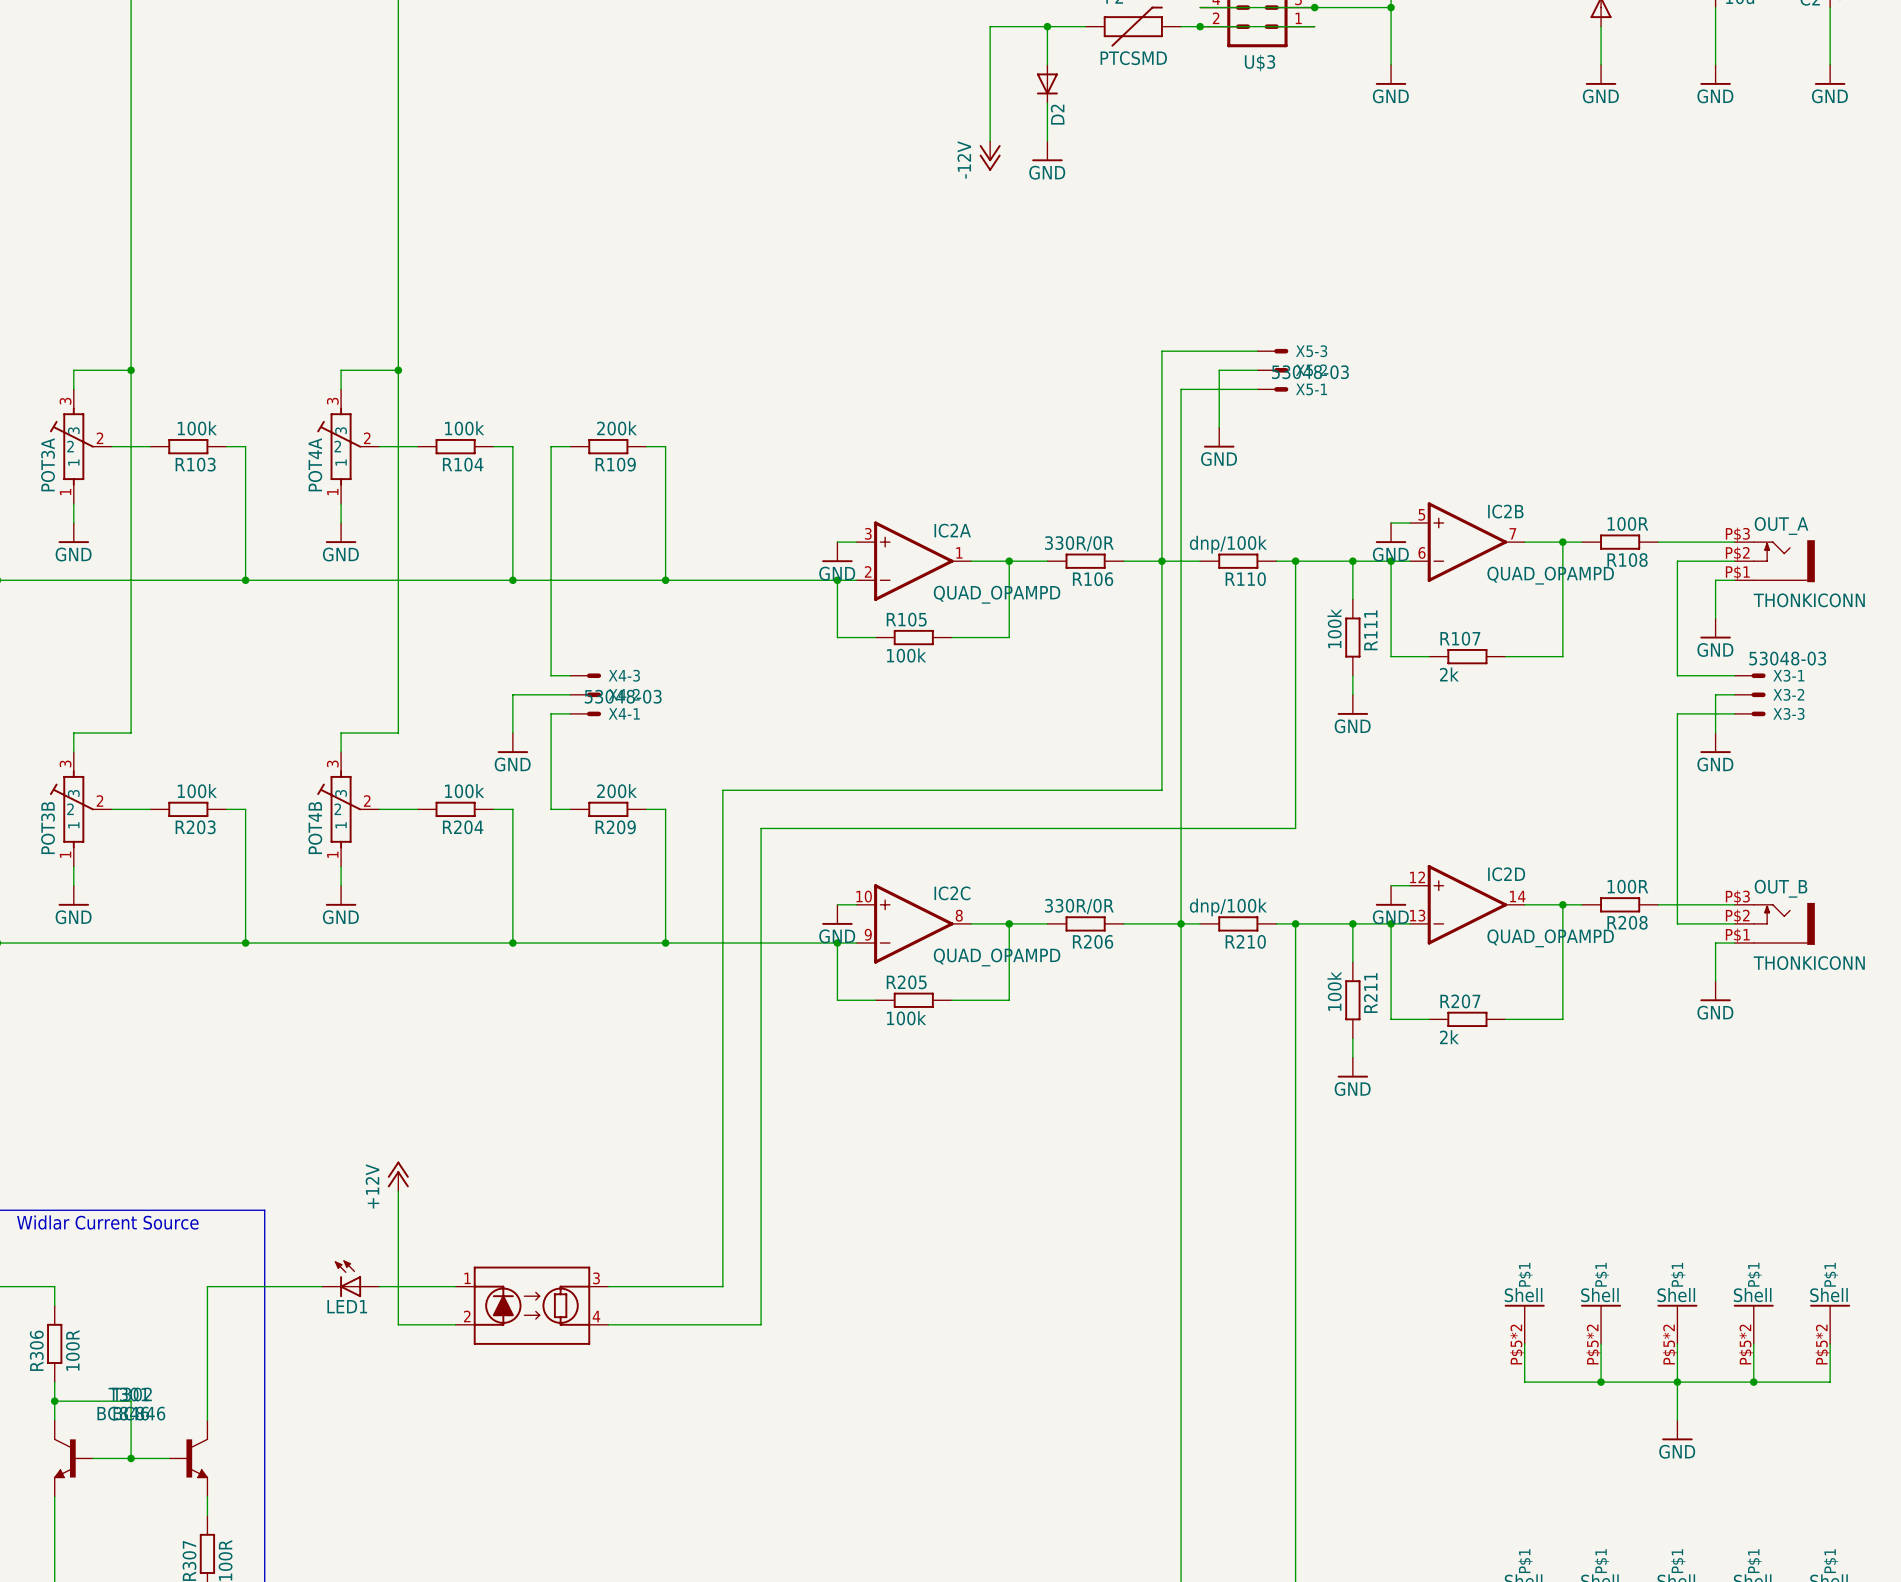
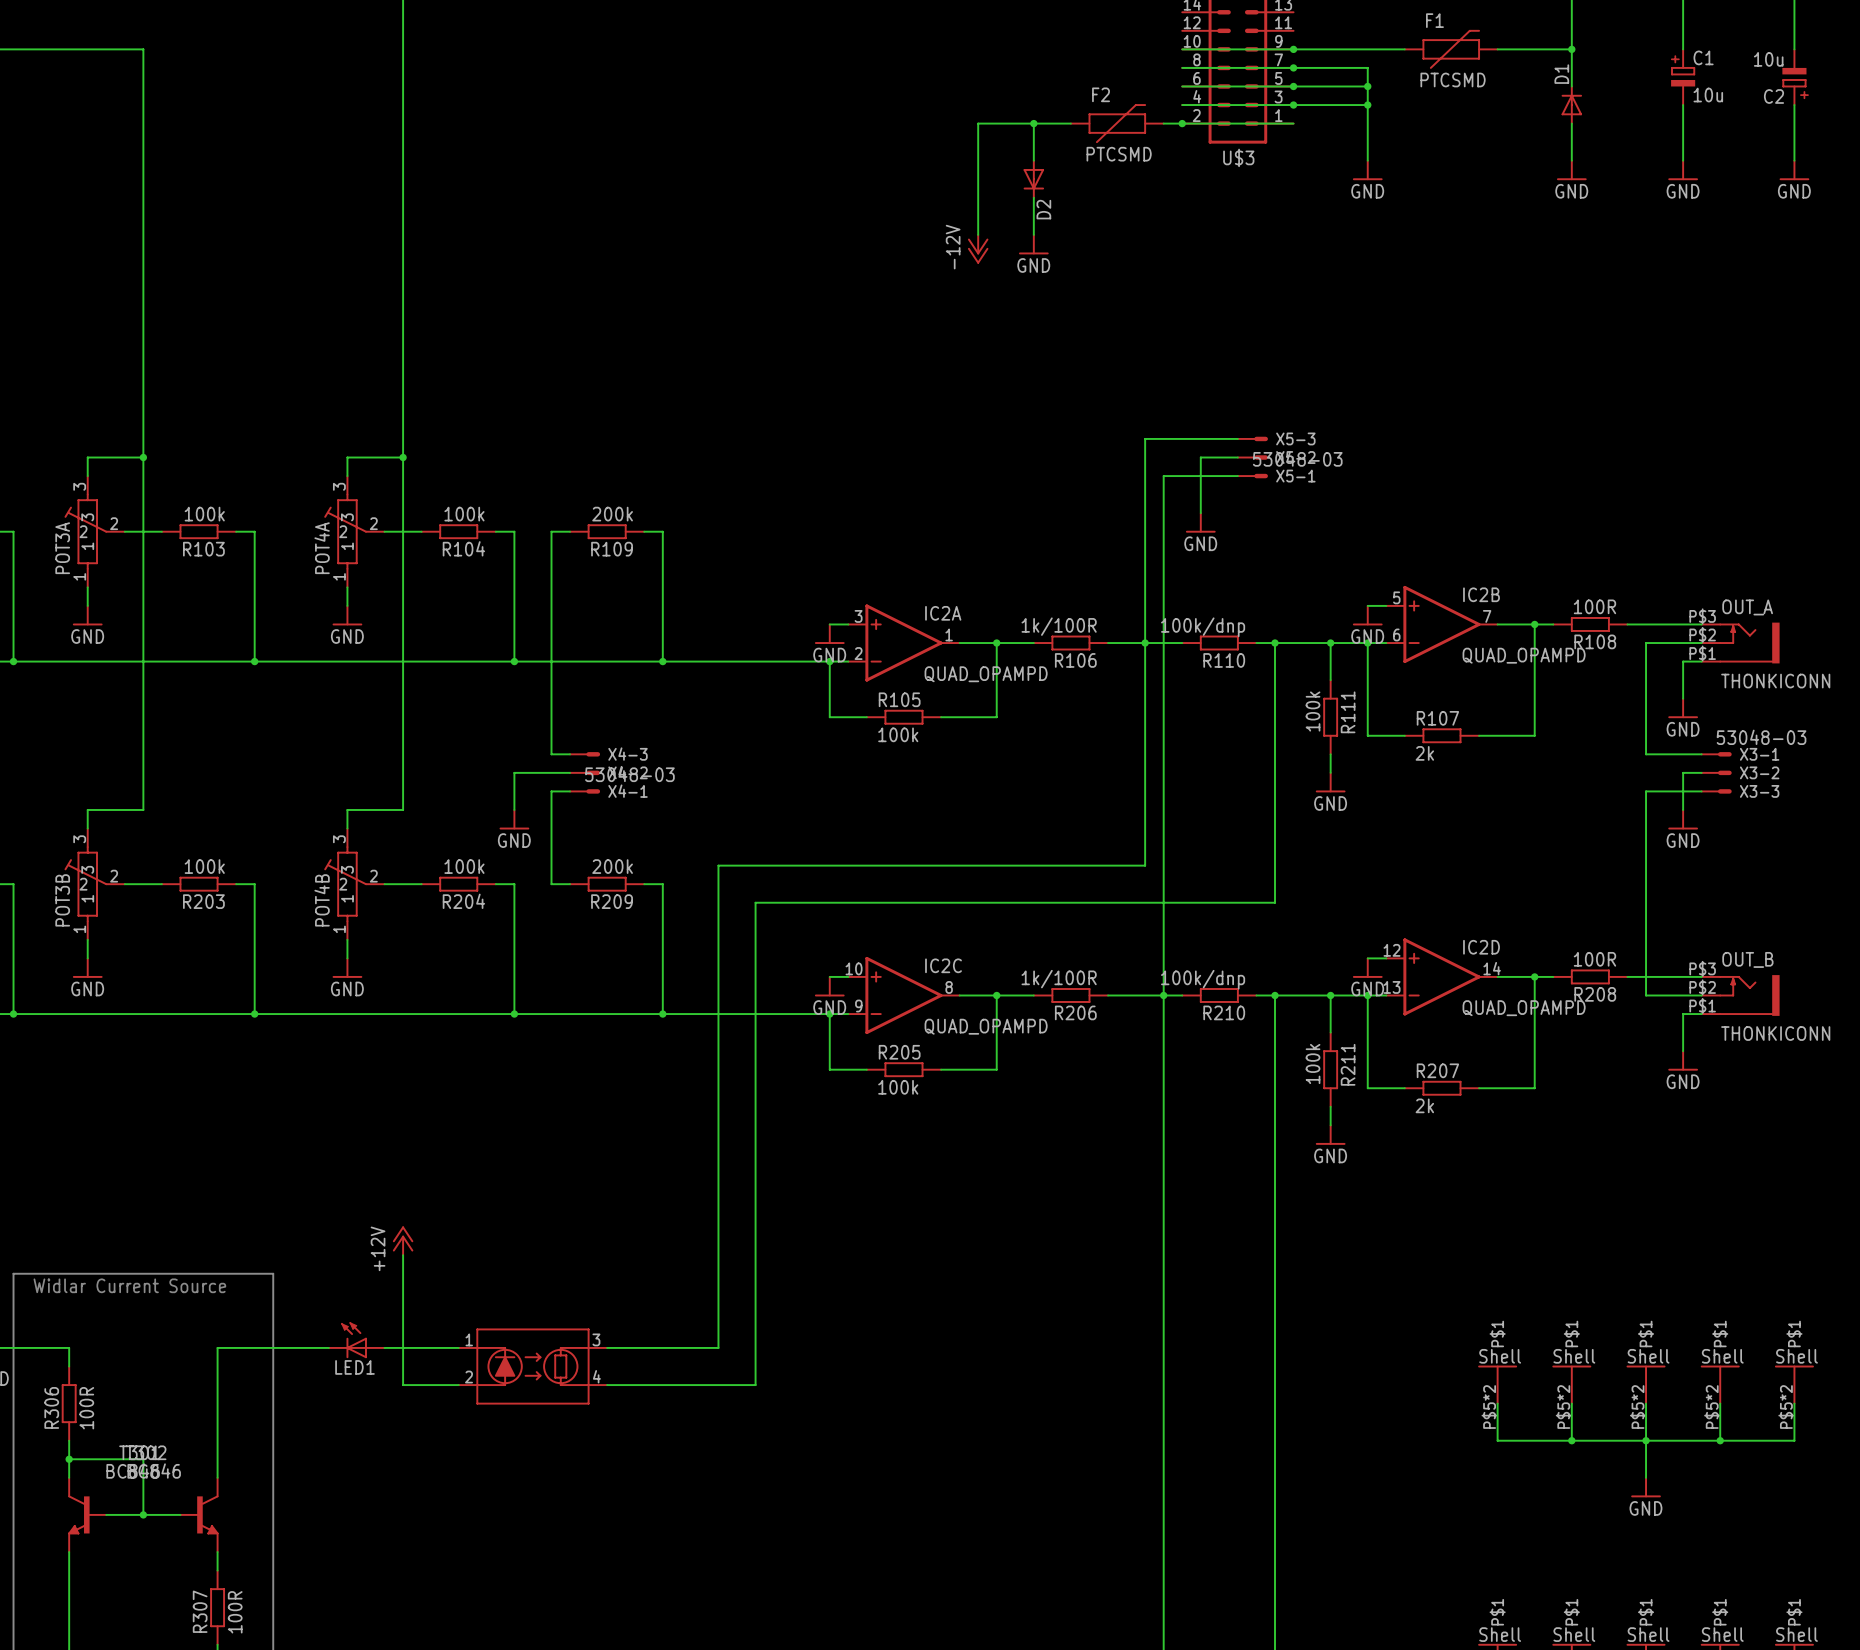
R106 value: 330R/0R (1079, 543) -> 1k/100R (1059, 626)
R110 value: dnp/100k (1228, 544) -> 100k/dnp (1203, 627)
R206 value: 330R/0R (1079, 906) -> 1k/100R (1059, 979)
R210 value: dnp/100k (1228, 907) -> 100k/dnp (1203, 979)

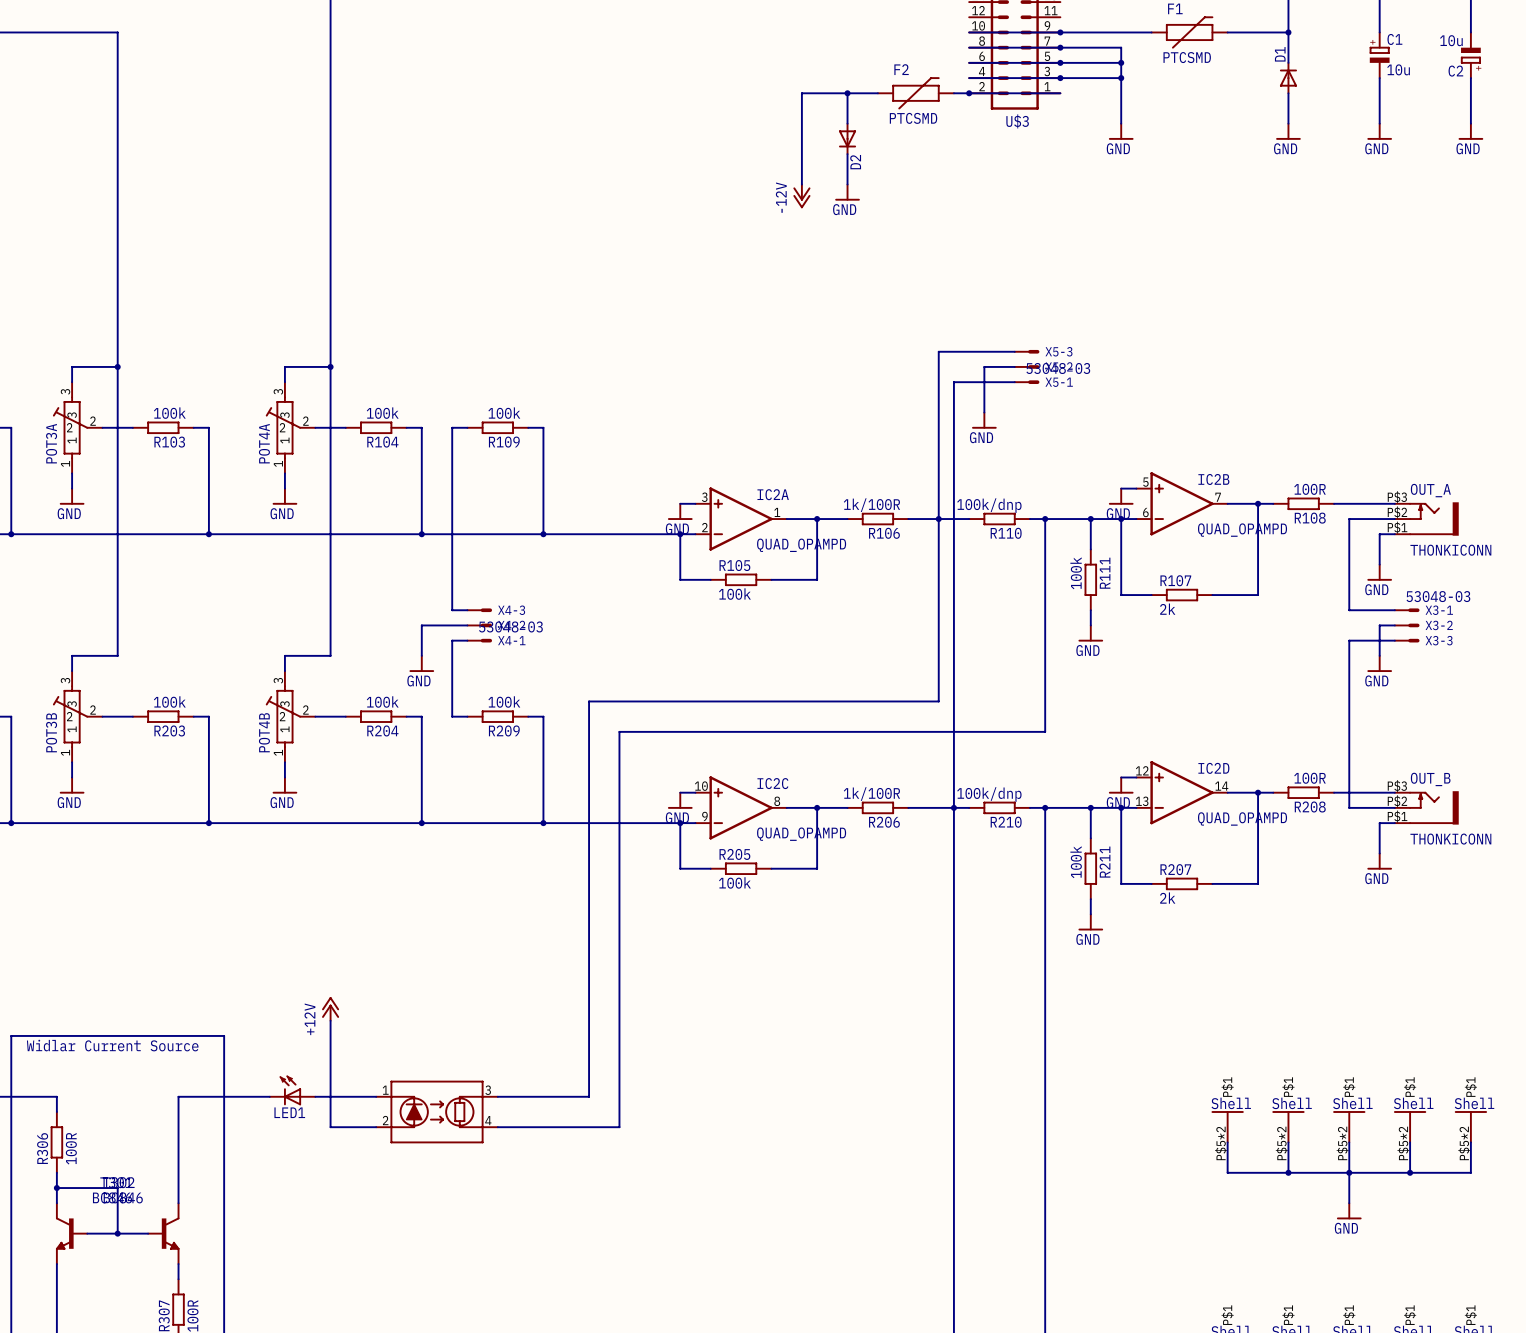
R109 value: 200k (612, 514) -> 100k (504, 413)
R209 value: 200k (612, 866) -> 100k (504, 702)

